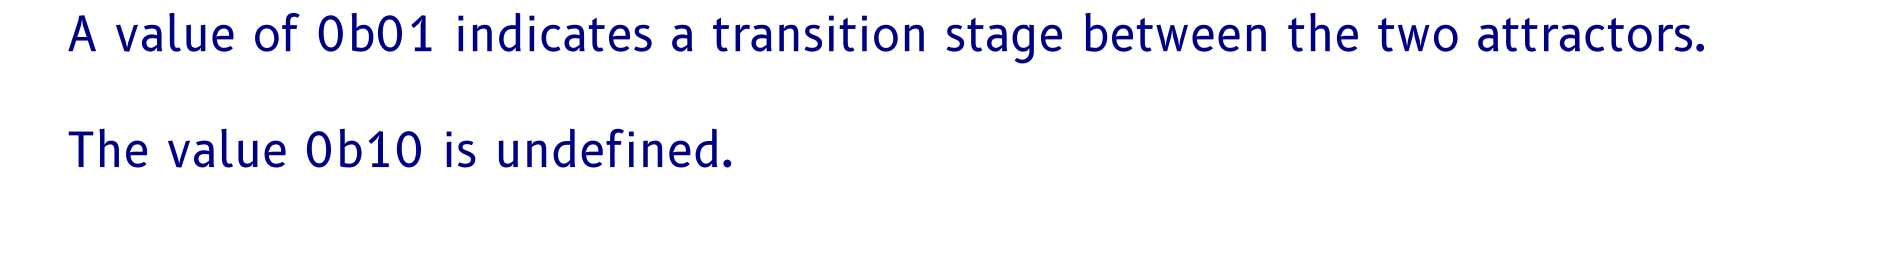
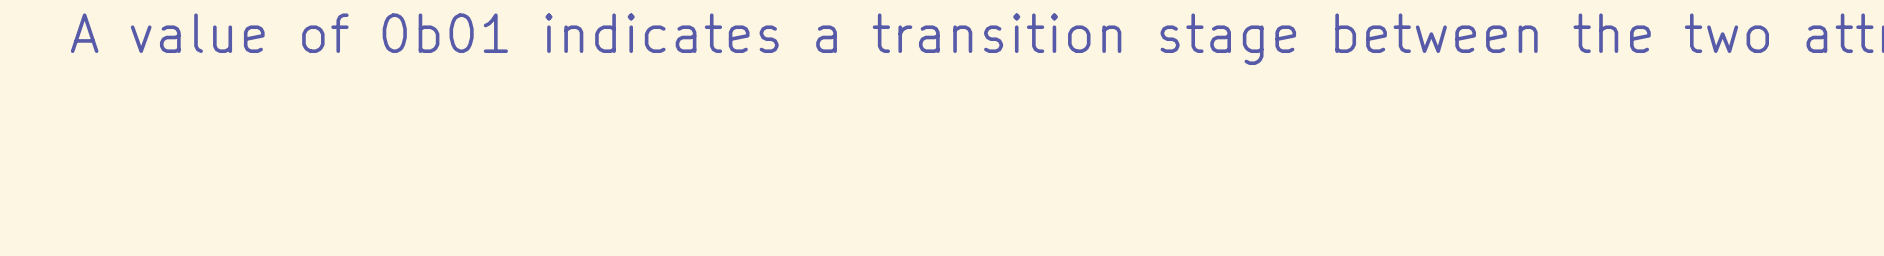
text: The value 0b10 is undefined. (399, 148) -> none

